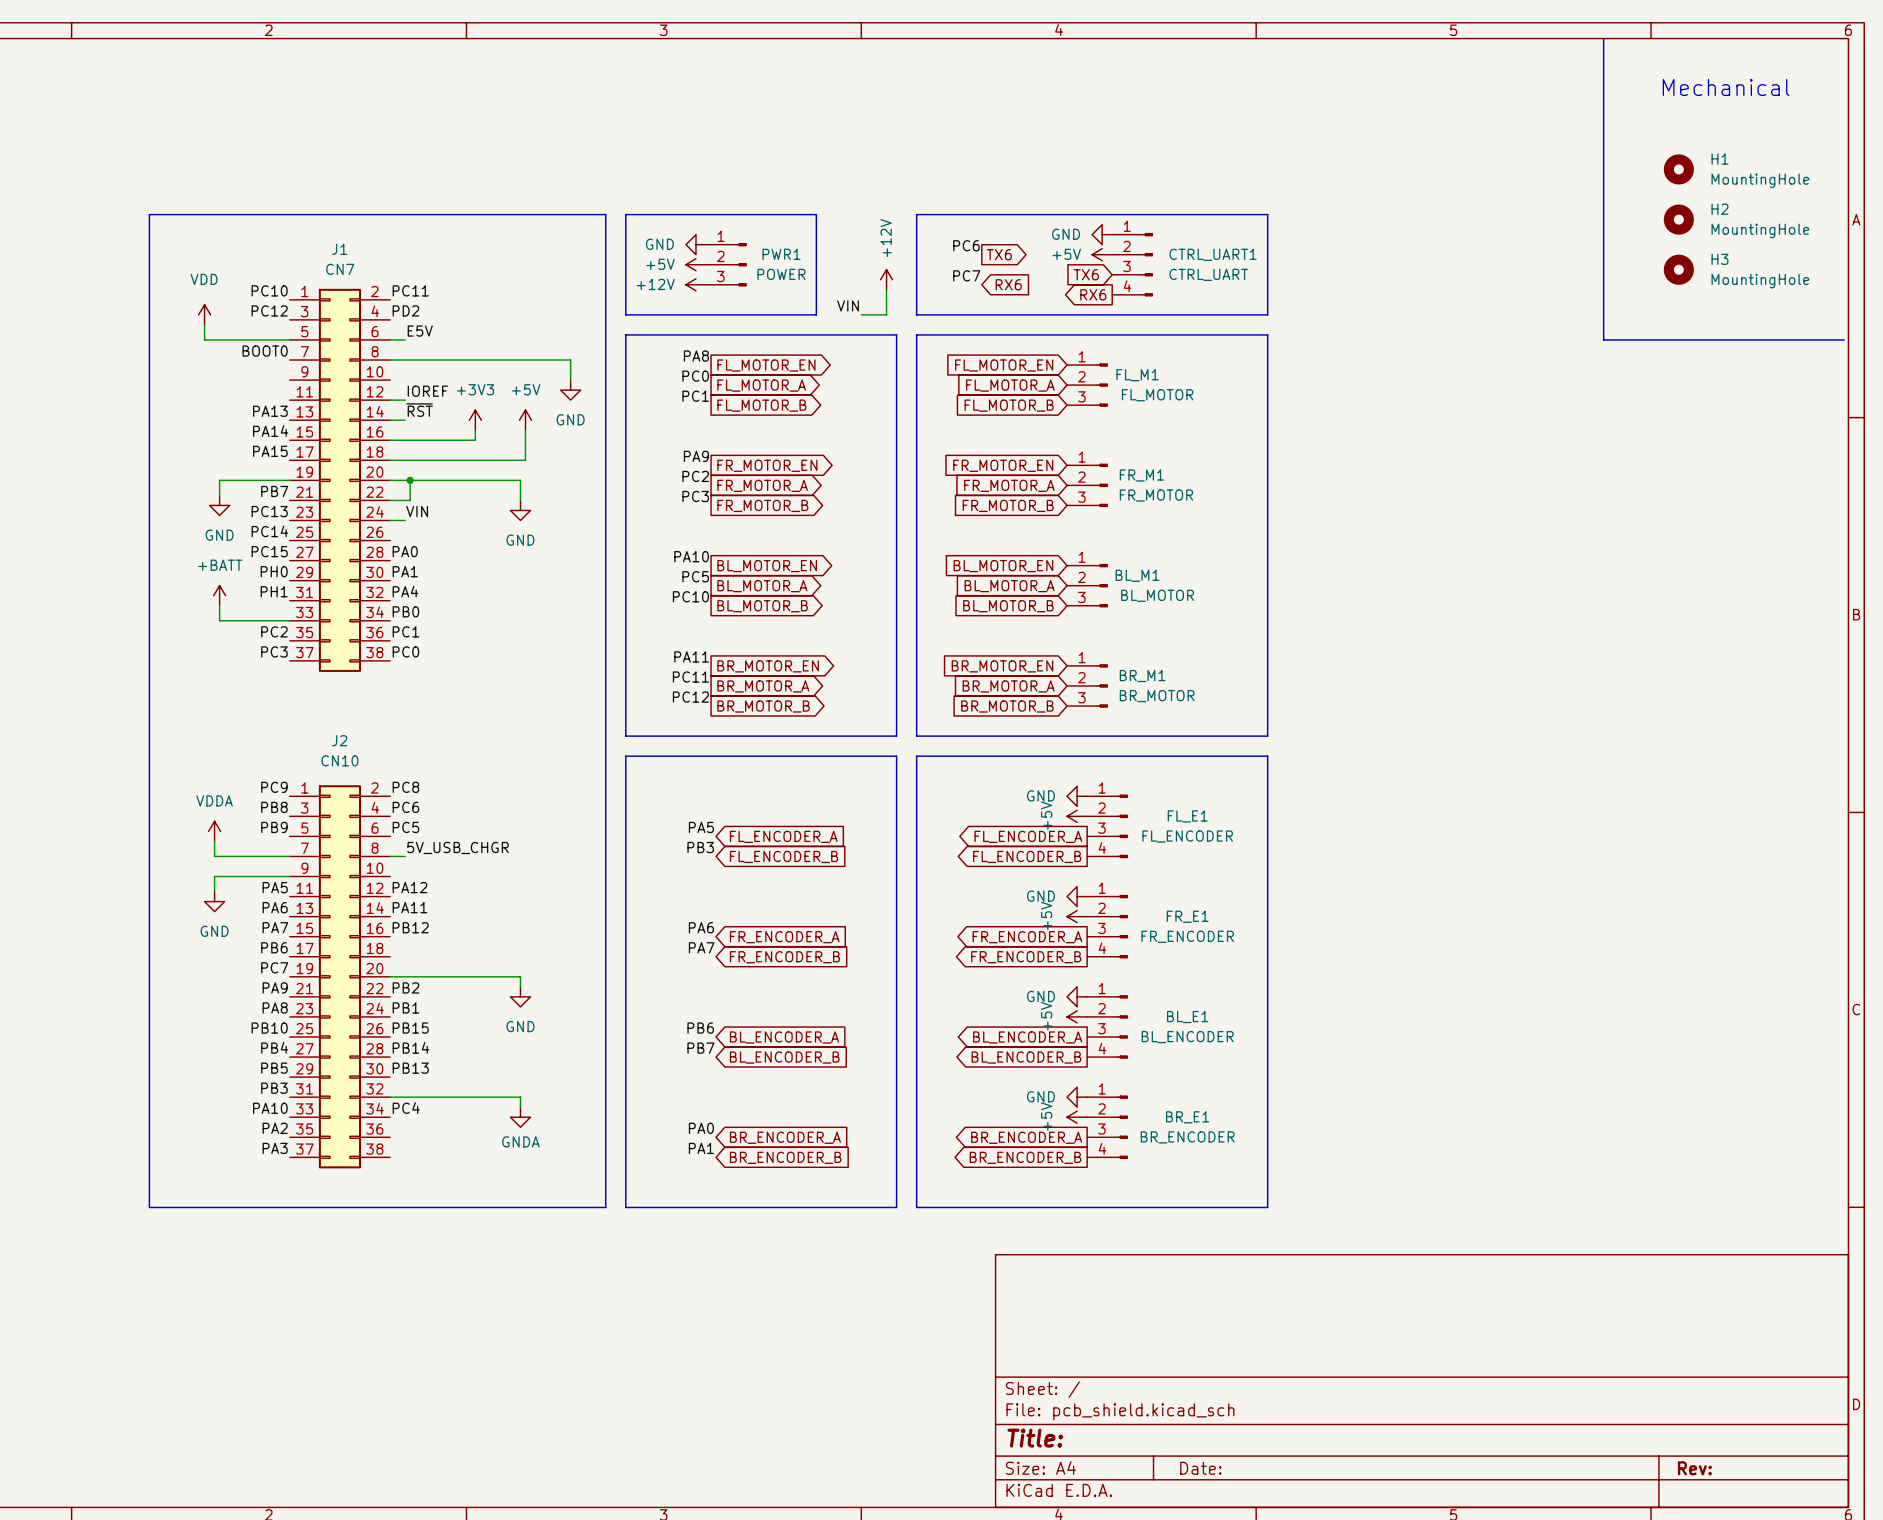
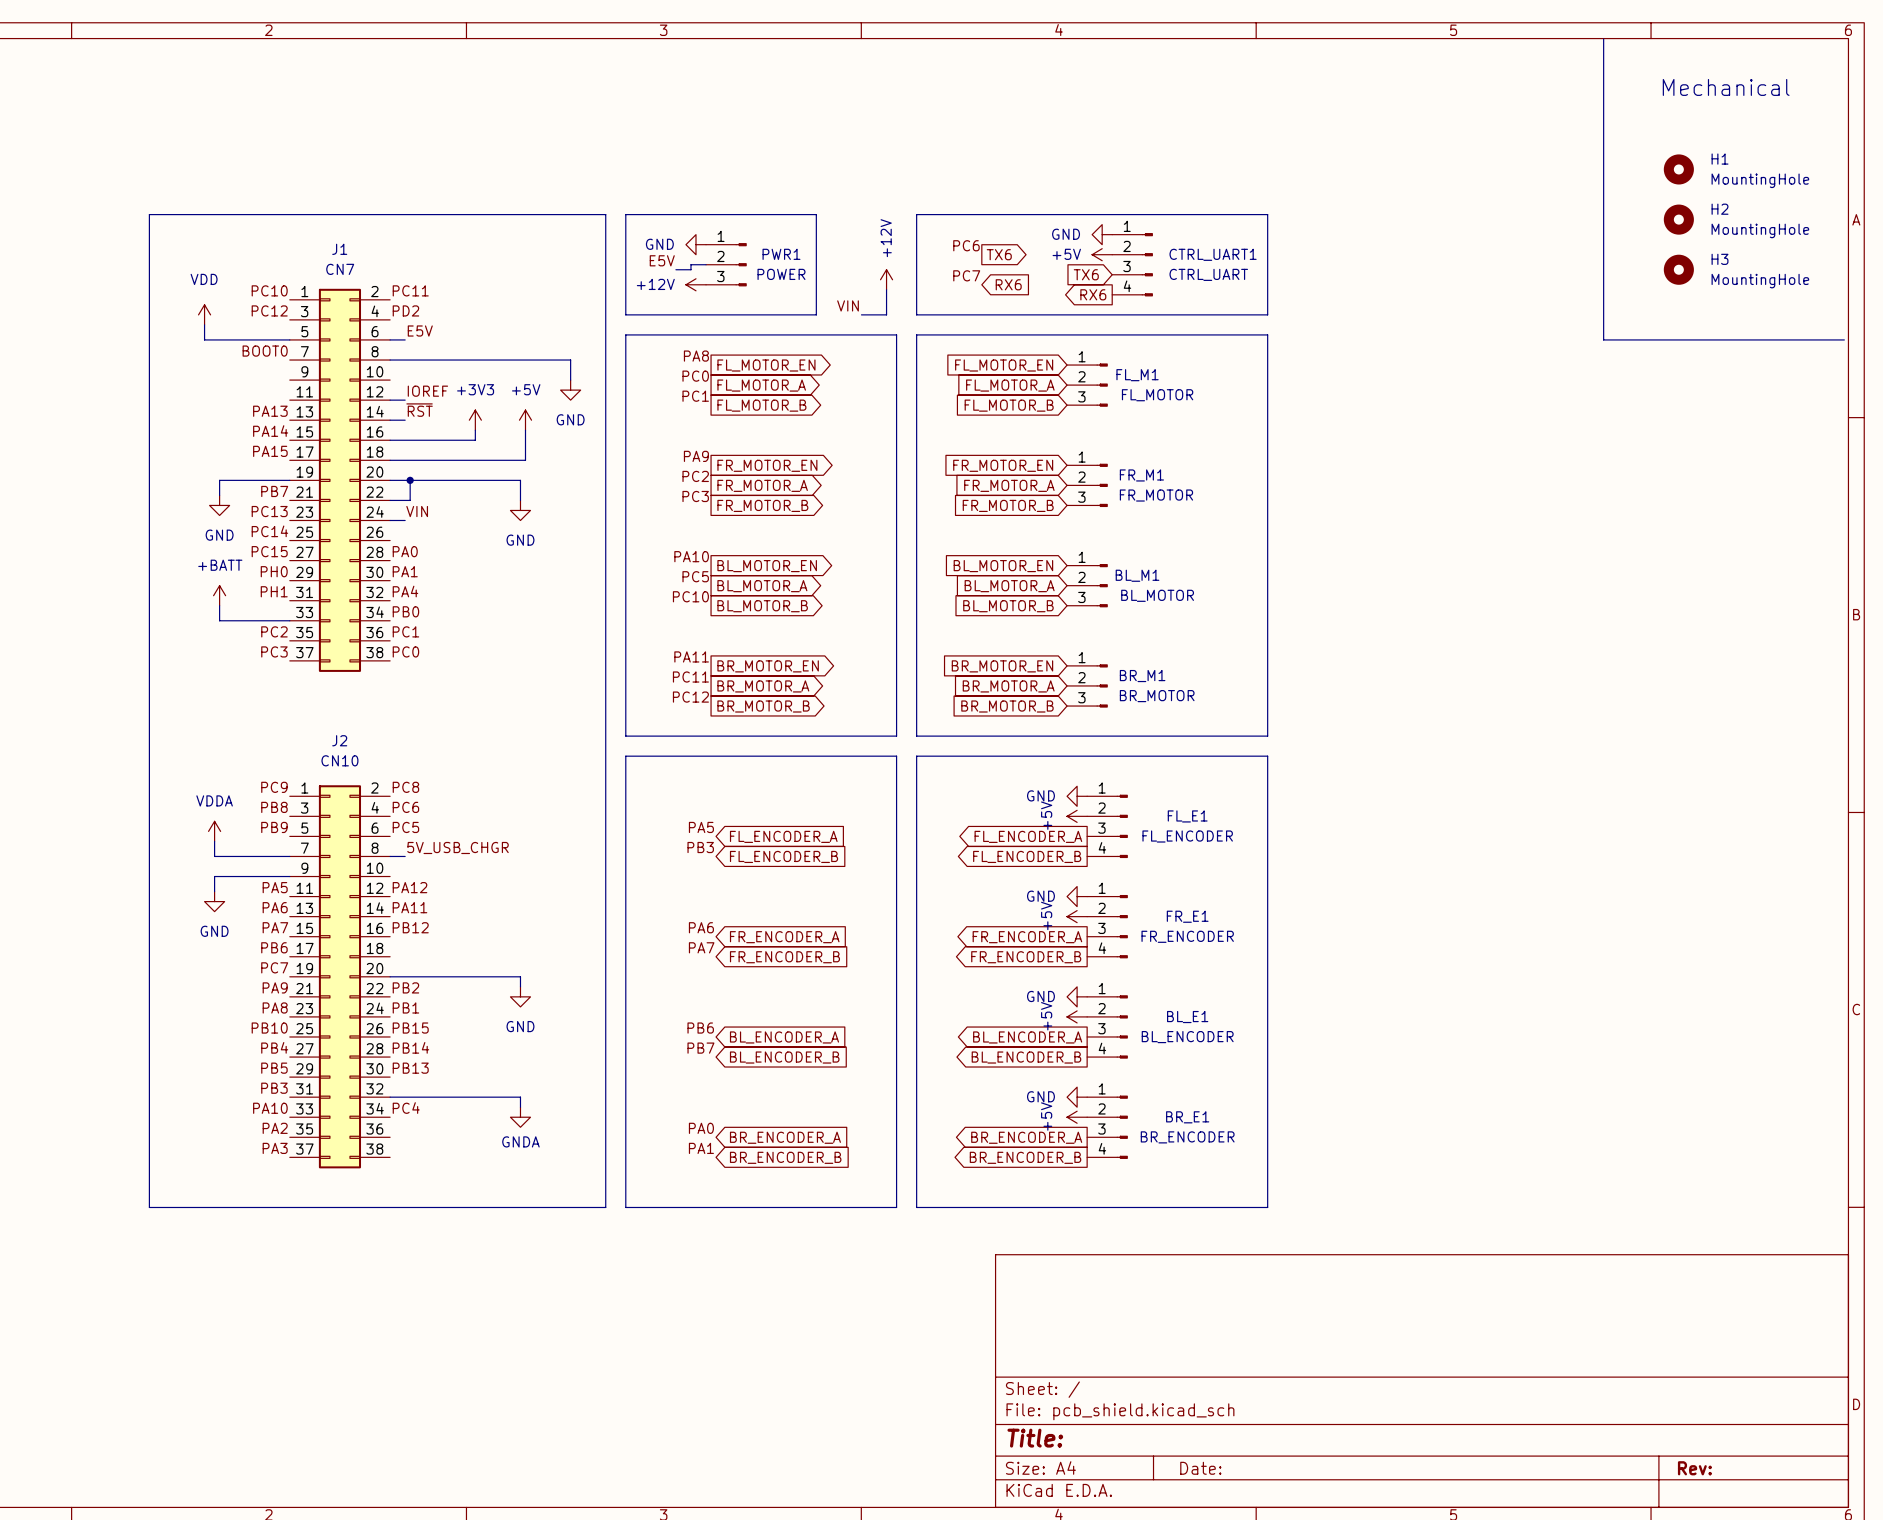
label: none -> E5V (662, 260)
power symbol: +5V (695, 264) -> none
wire: none -> (706, 264) (690, 264) (690, 269) (675, 269)

